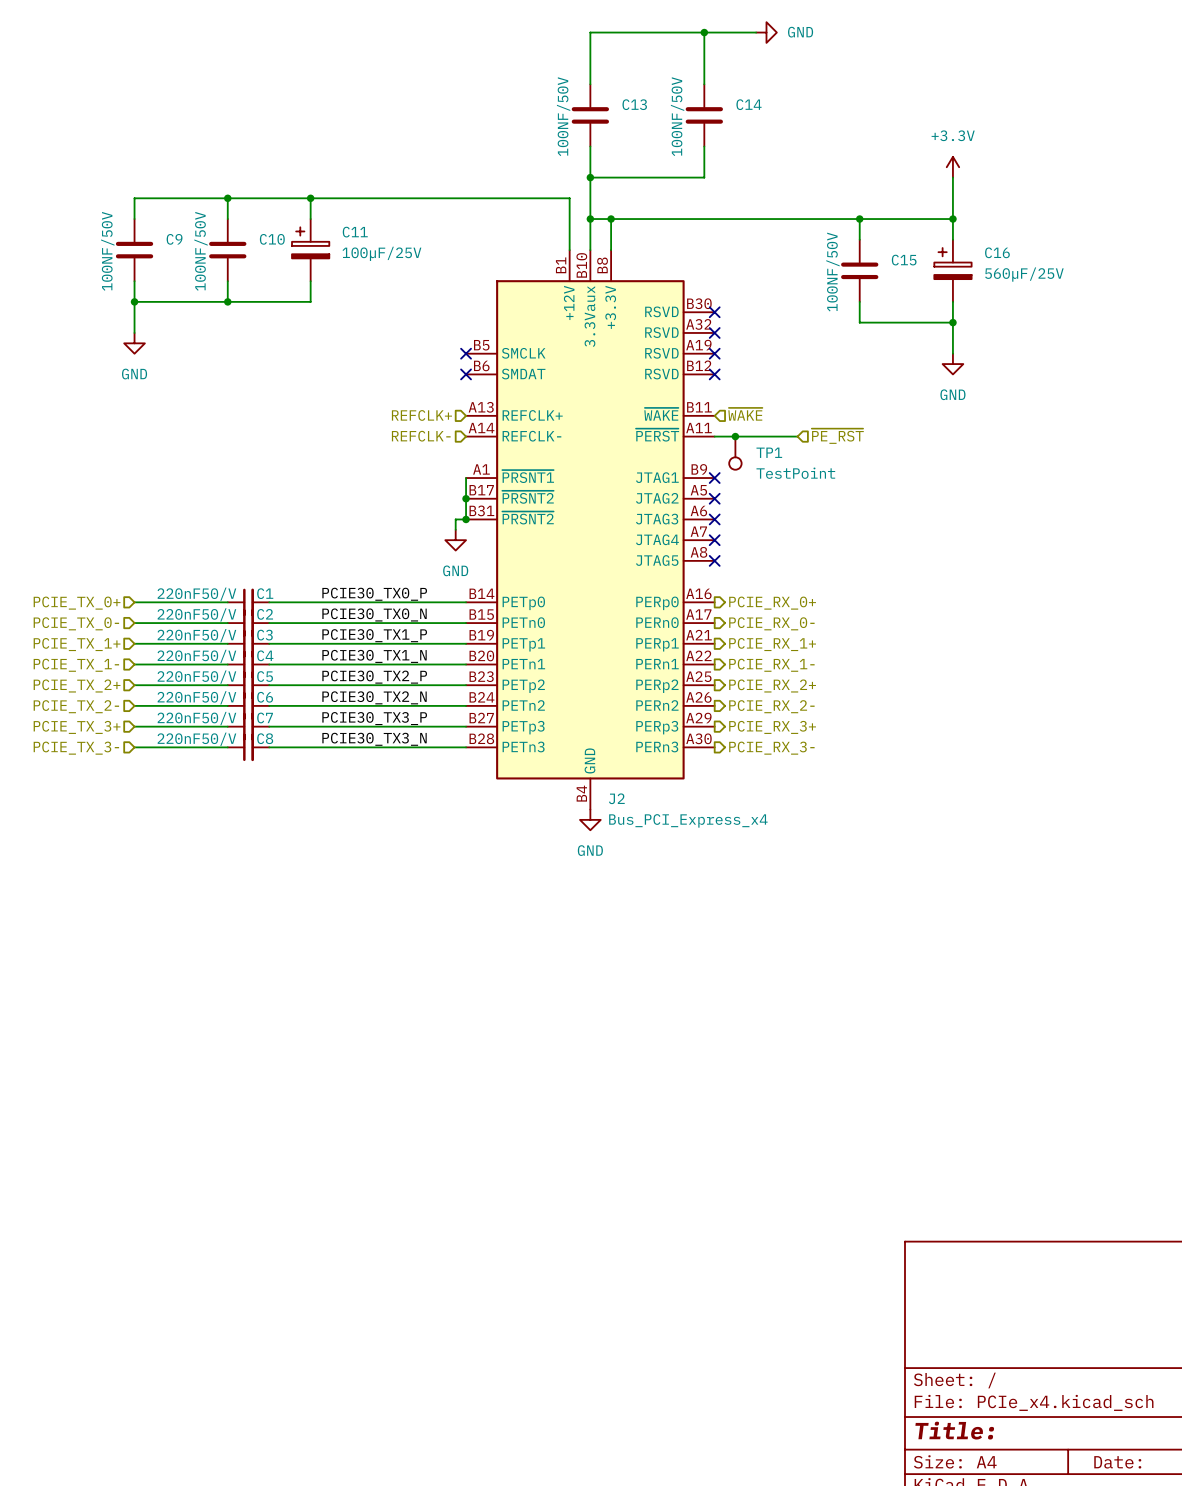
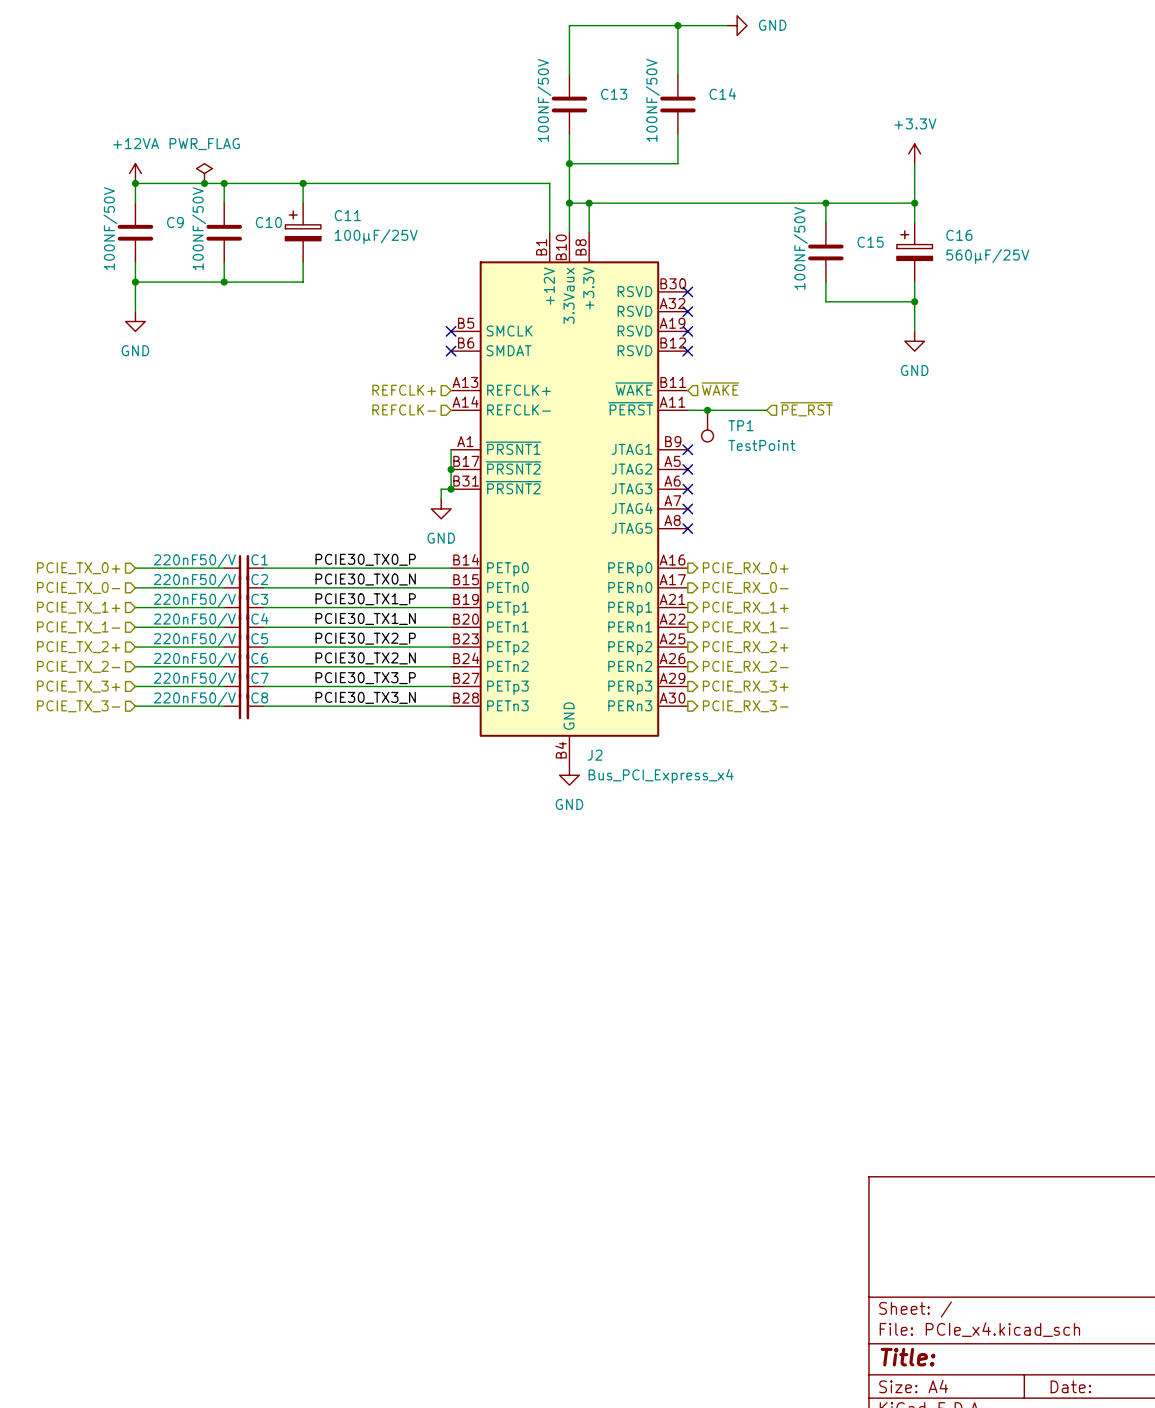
power symbol: none -> +12VA (135, 173)
power symbol: none -> PWR_FLAG (204, 173)
junction: none -> (135, 183)
junction: none -> (204, 183)

